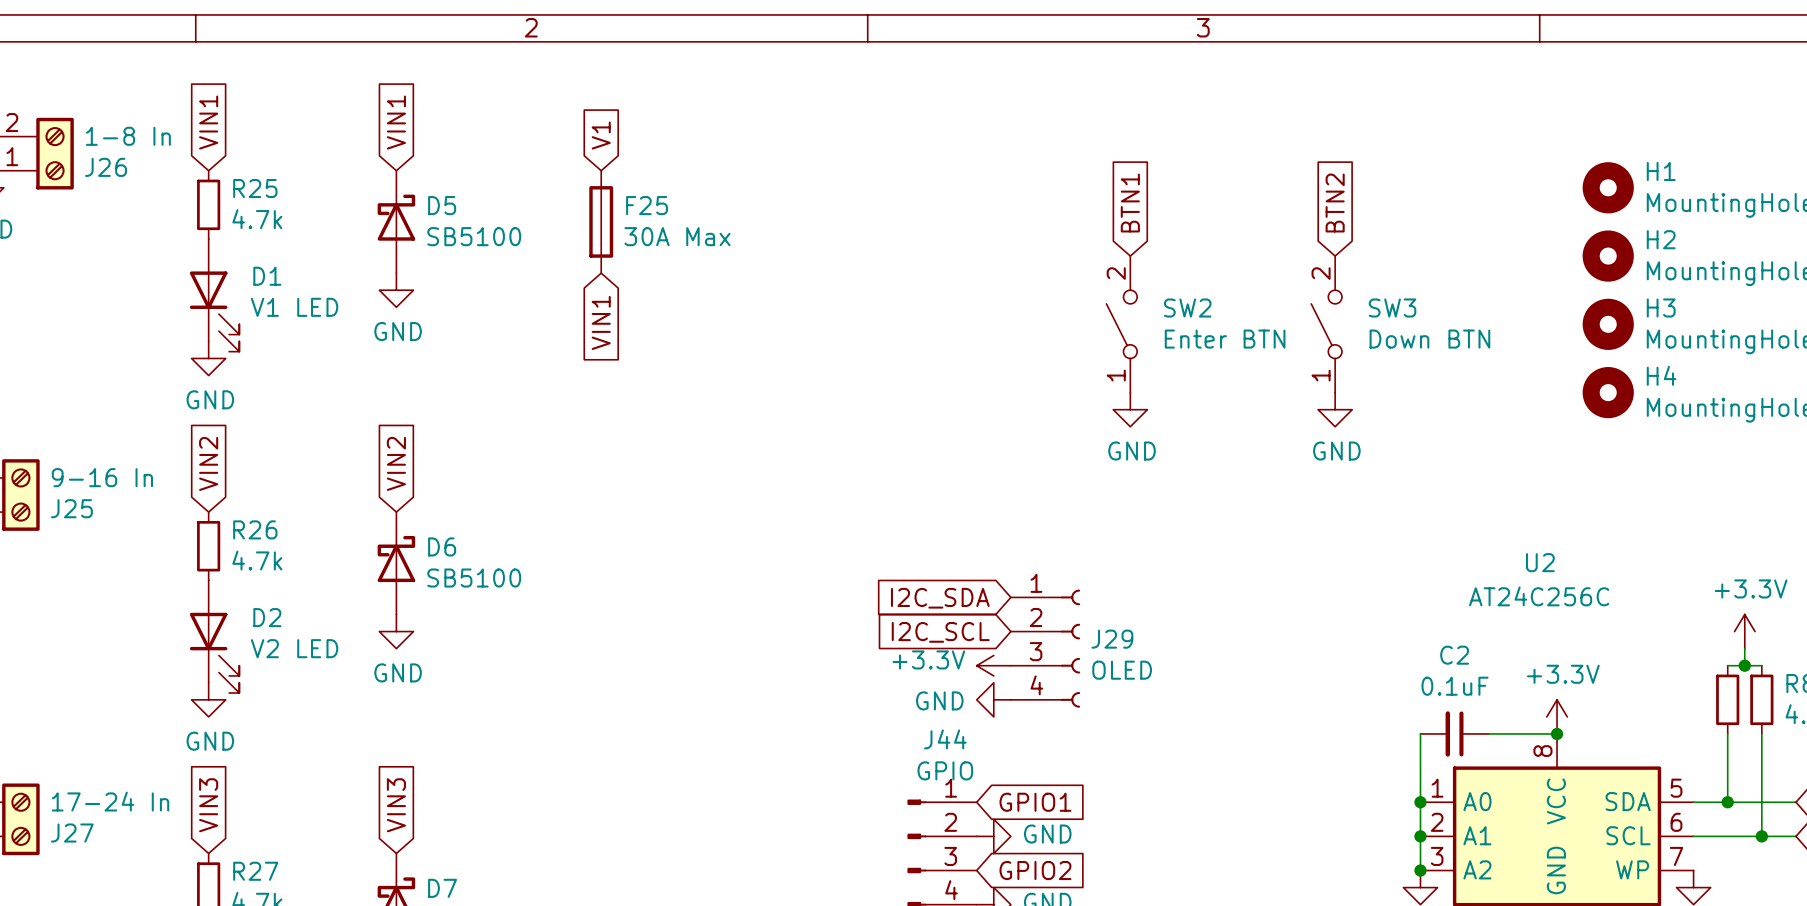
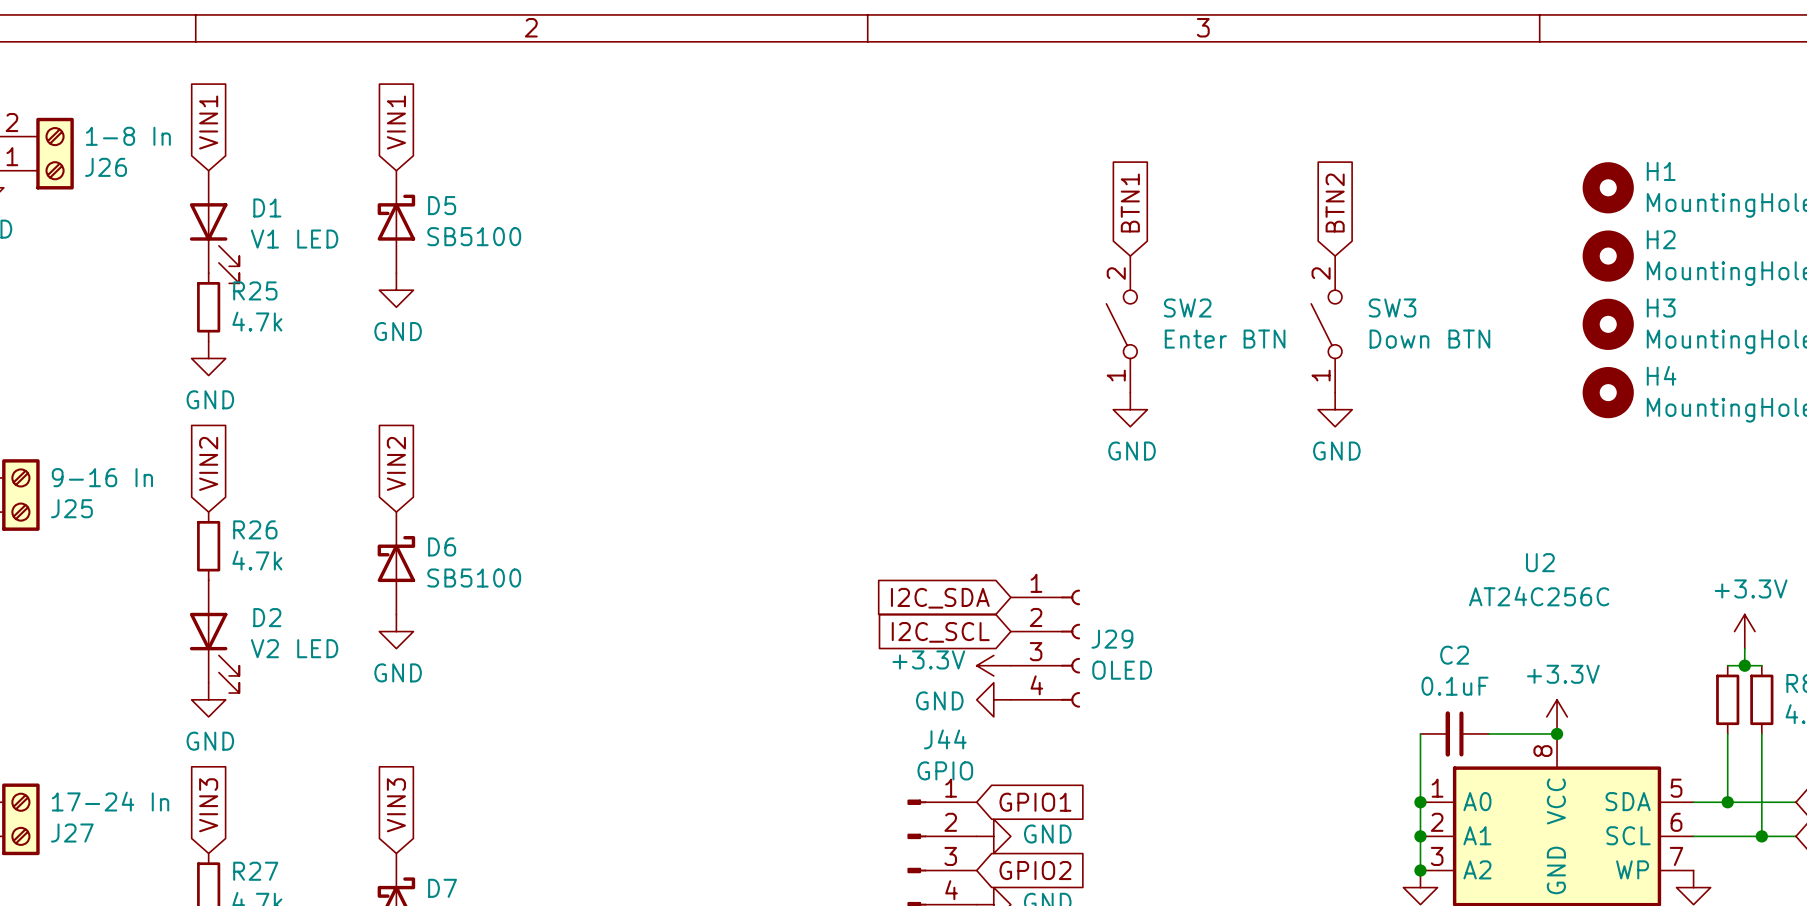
global label: V1 (601, 135) -> none
R25 position: (208, 204) -> (208, 307)
F25: 30A Max (601, 221) -> none
D1 position: (214, 295) -> (214, 227)
global label: VIN1 (601, 322) -> none

